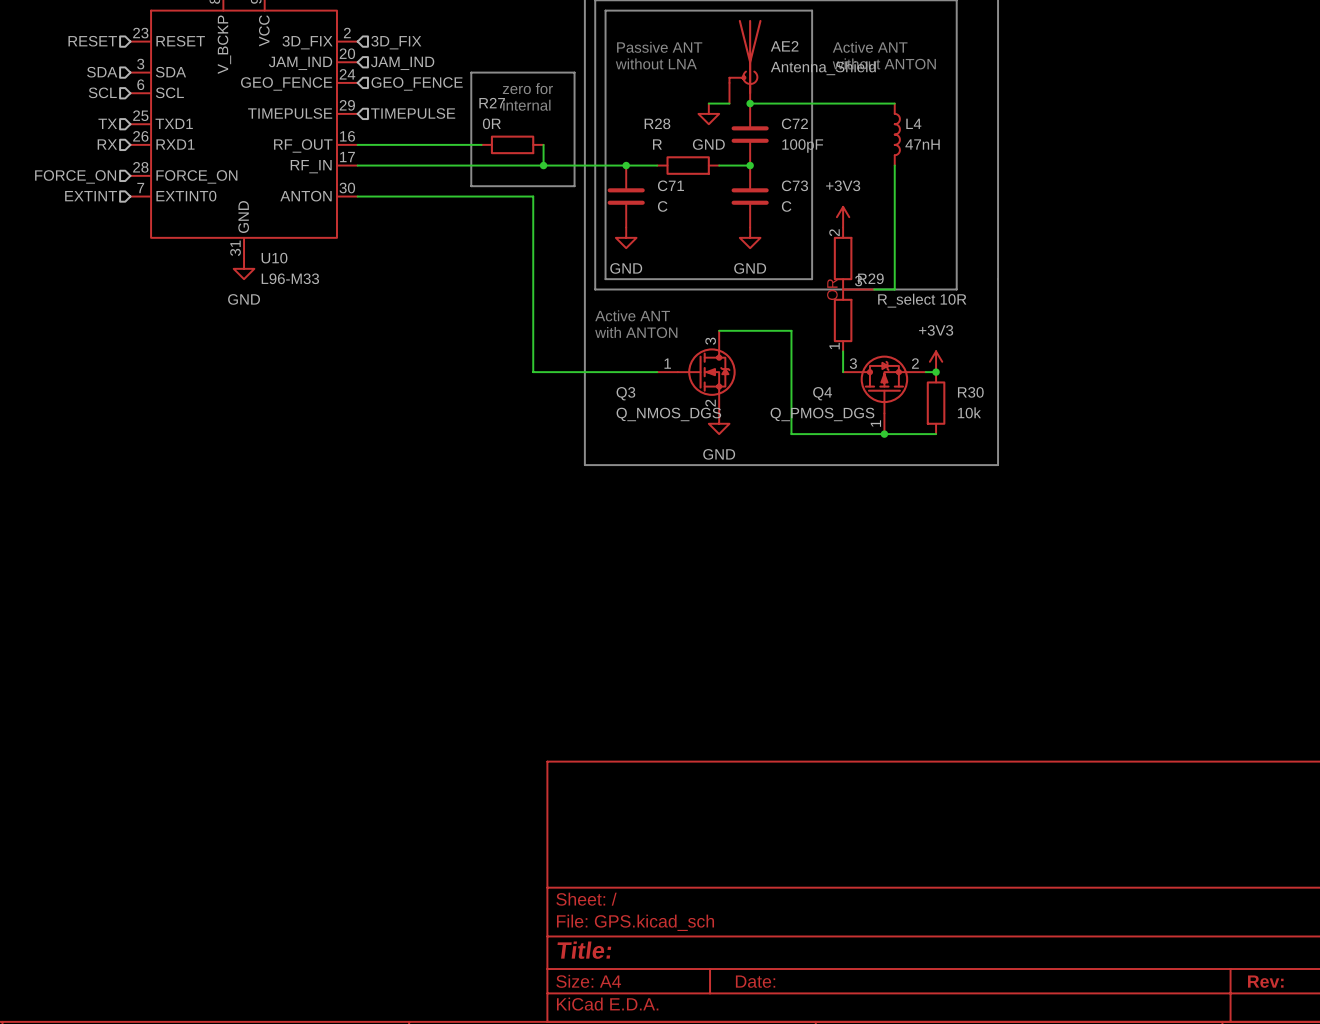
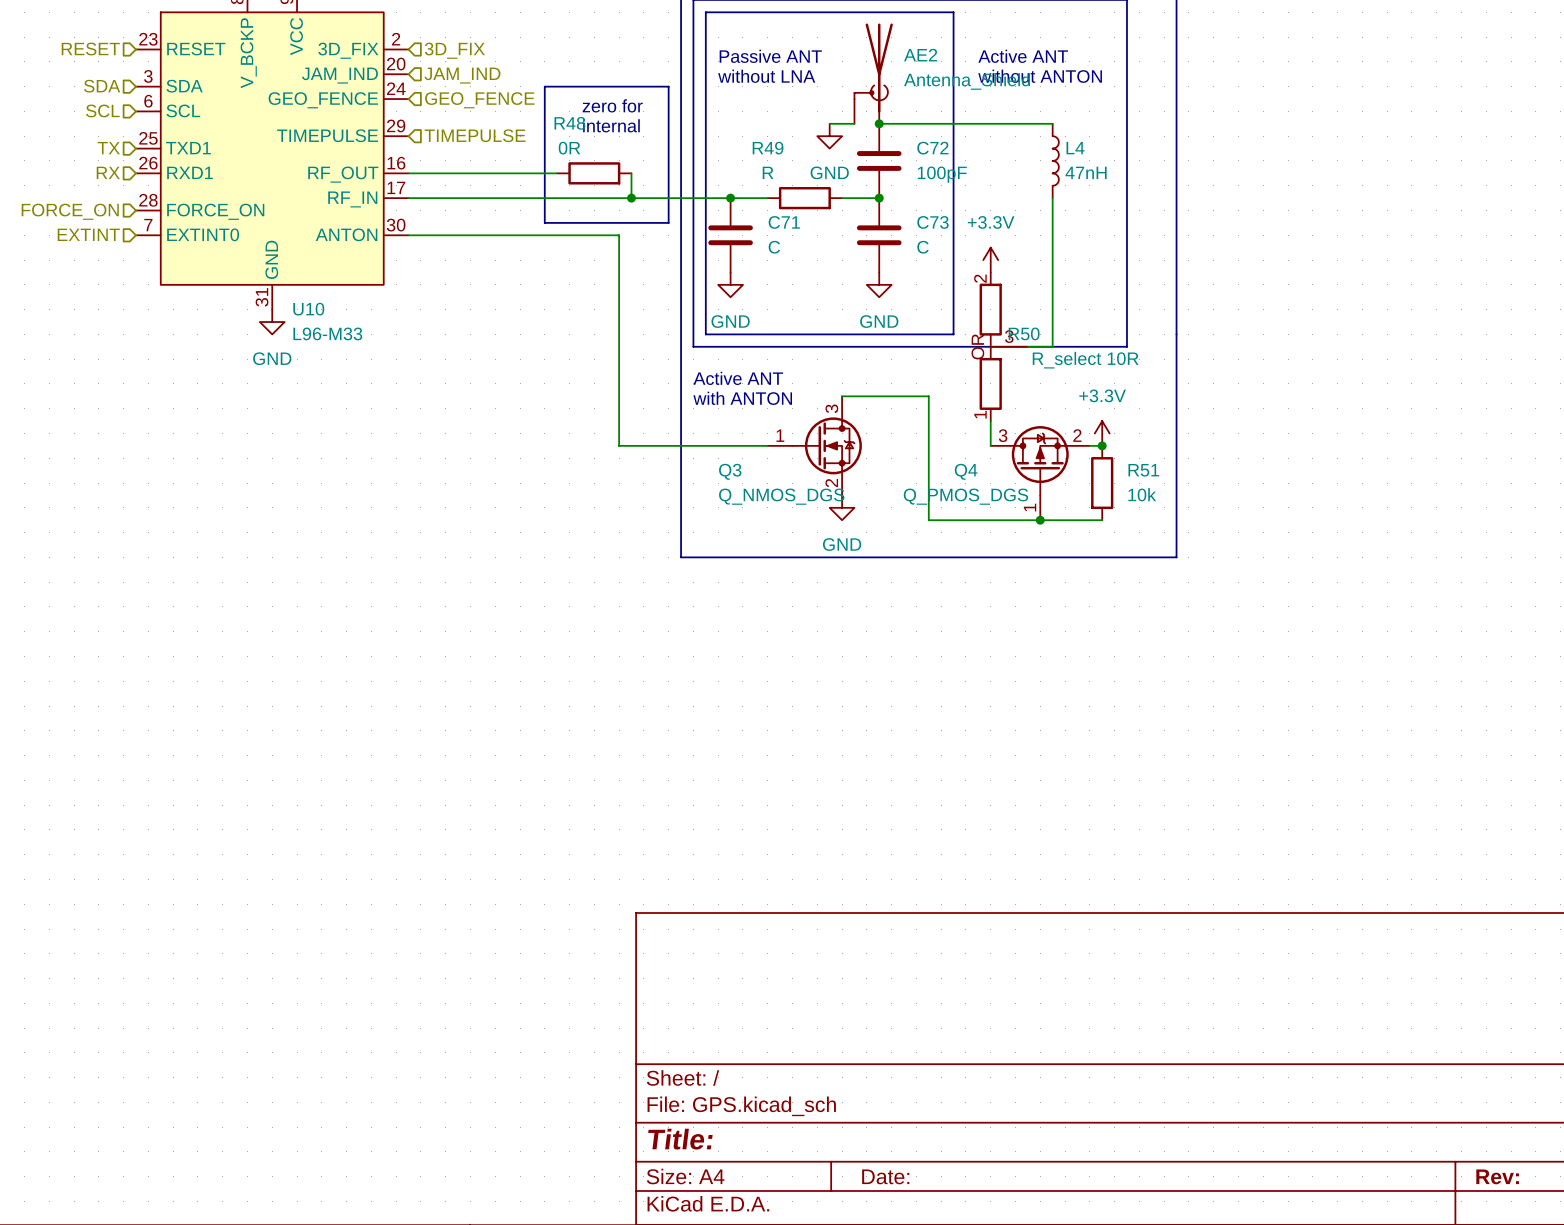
R27 name: R27 (492, 103) -> R48 (569, 123)
R28 name: R28 (657, 123) -> R49 (768, 148)
power symbol: +3V3 (843, 217) -> +3.3V (990, 260)
R29 name: R29 (870, 278) -> R50 (1024, 333)
power symbol: +3V3 (936, 361) -> +3.3V (1102, 433)
R30 name: R30 (970, 392) -> R51 (1143, 470)

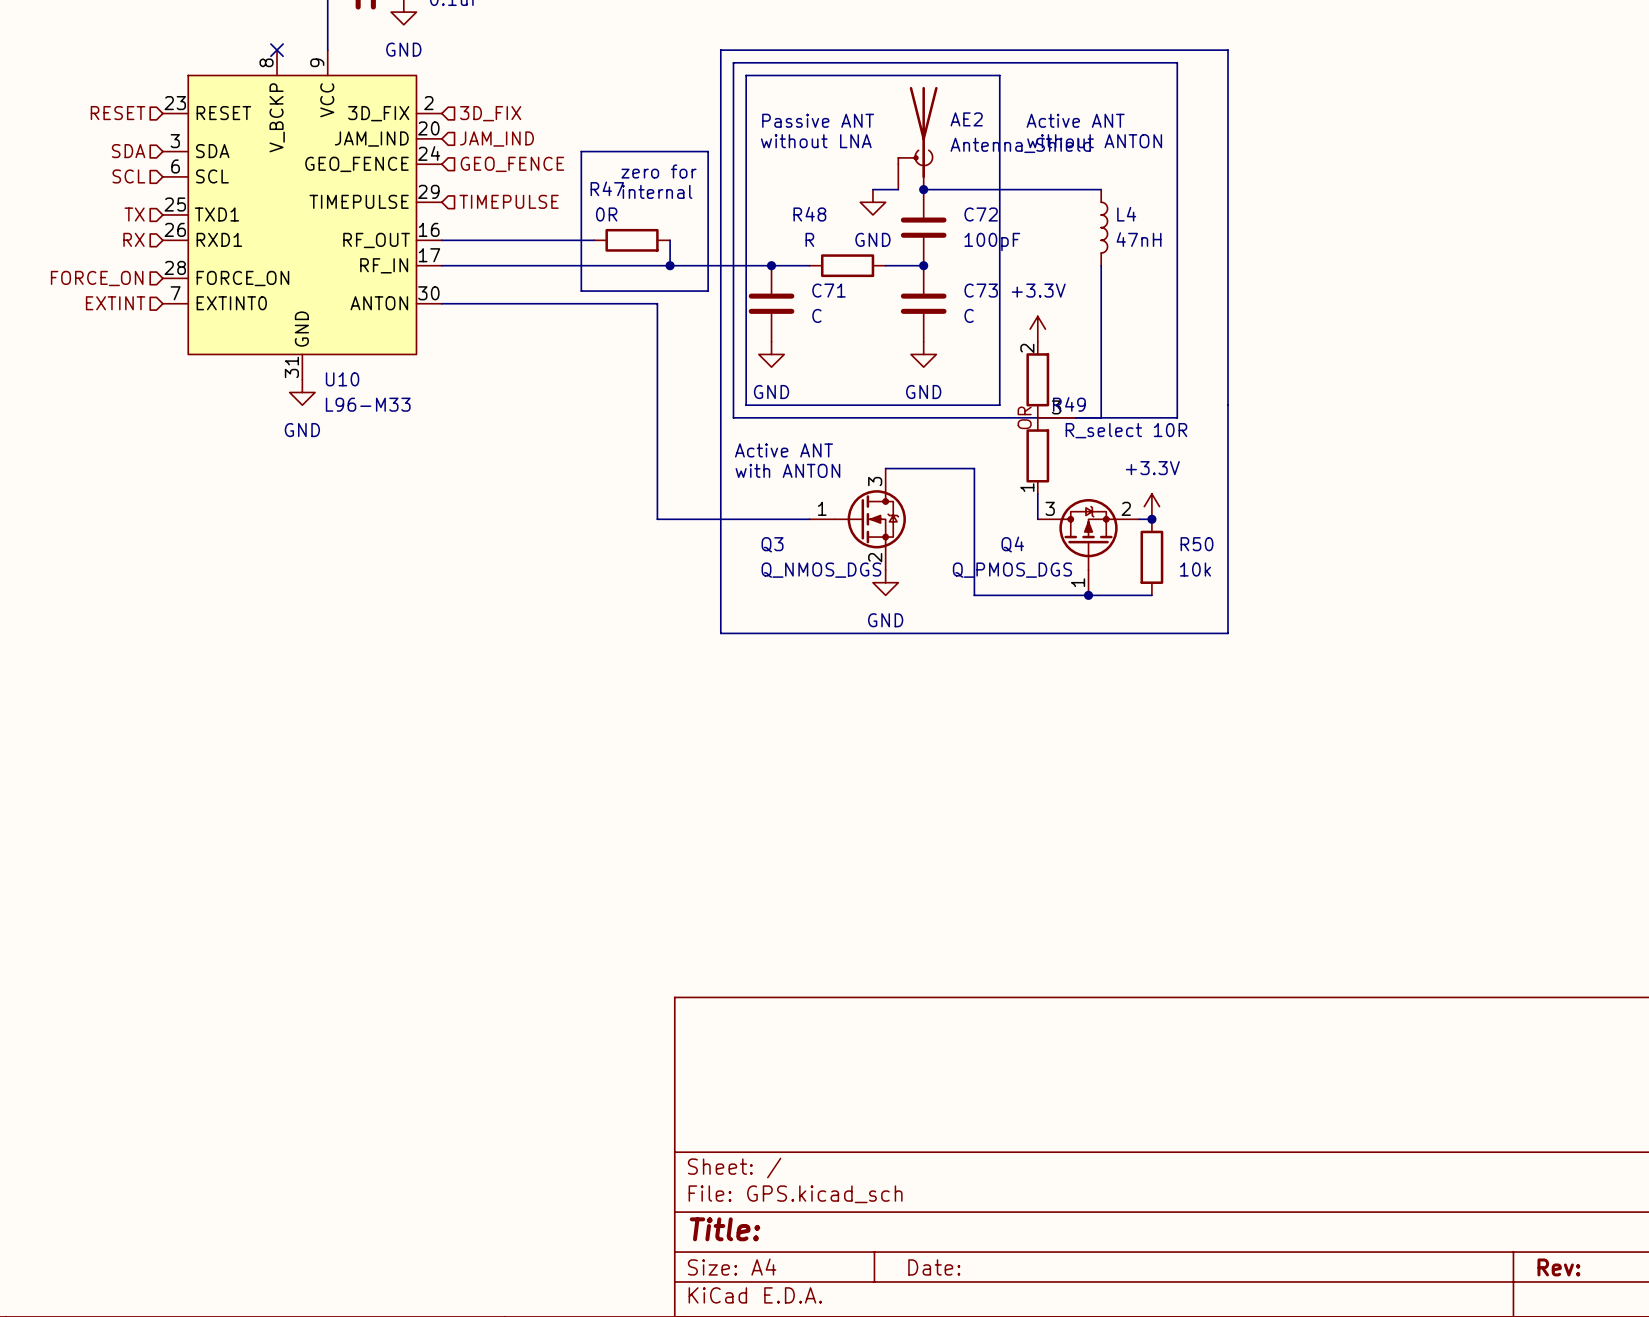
R48 name: R48 (569, 123) -> R47 (607, 188)
R49 name: R49 (768, 148) -> R48 (809, 214)
R50 name: R50 (1024, 333) -> R49 (1069, 404)
R51 name: R51 (1143, 470) -> R50 (1197, 544)

